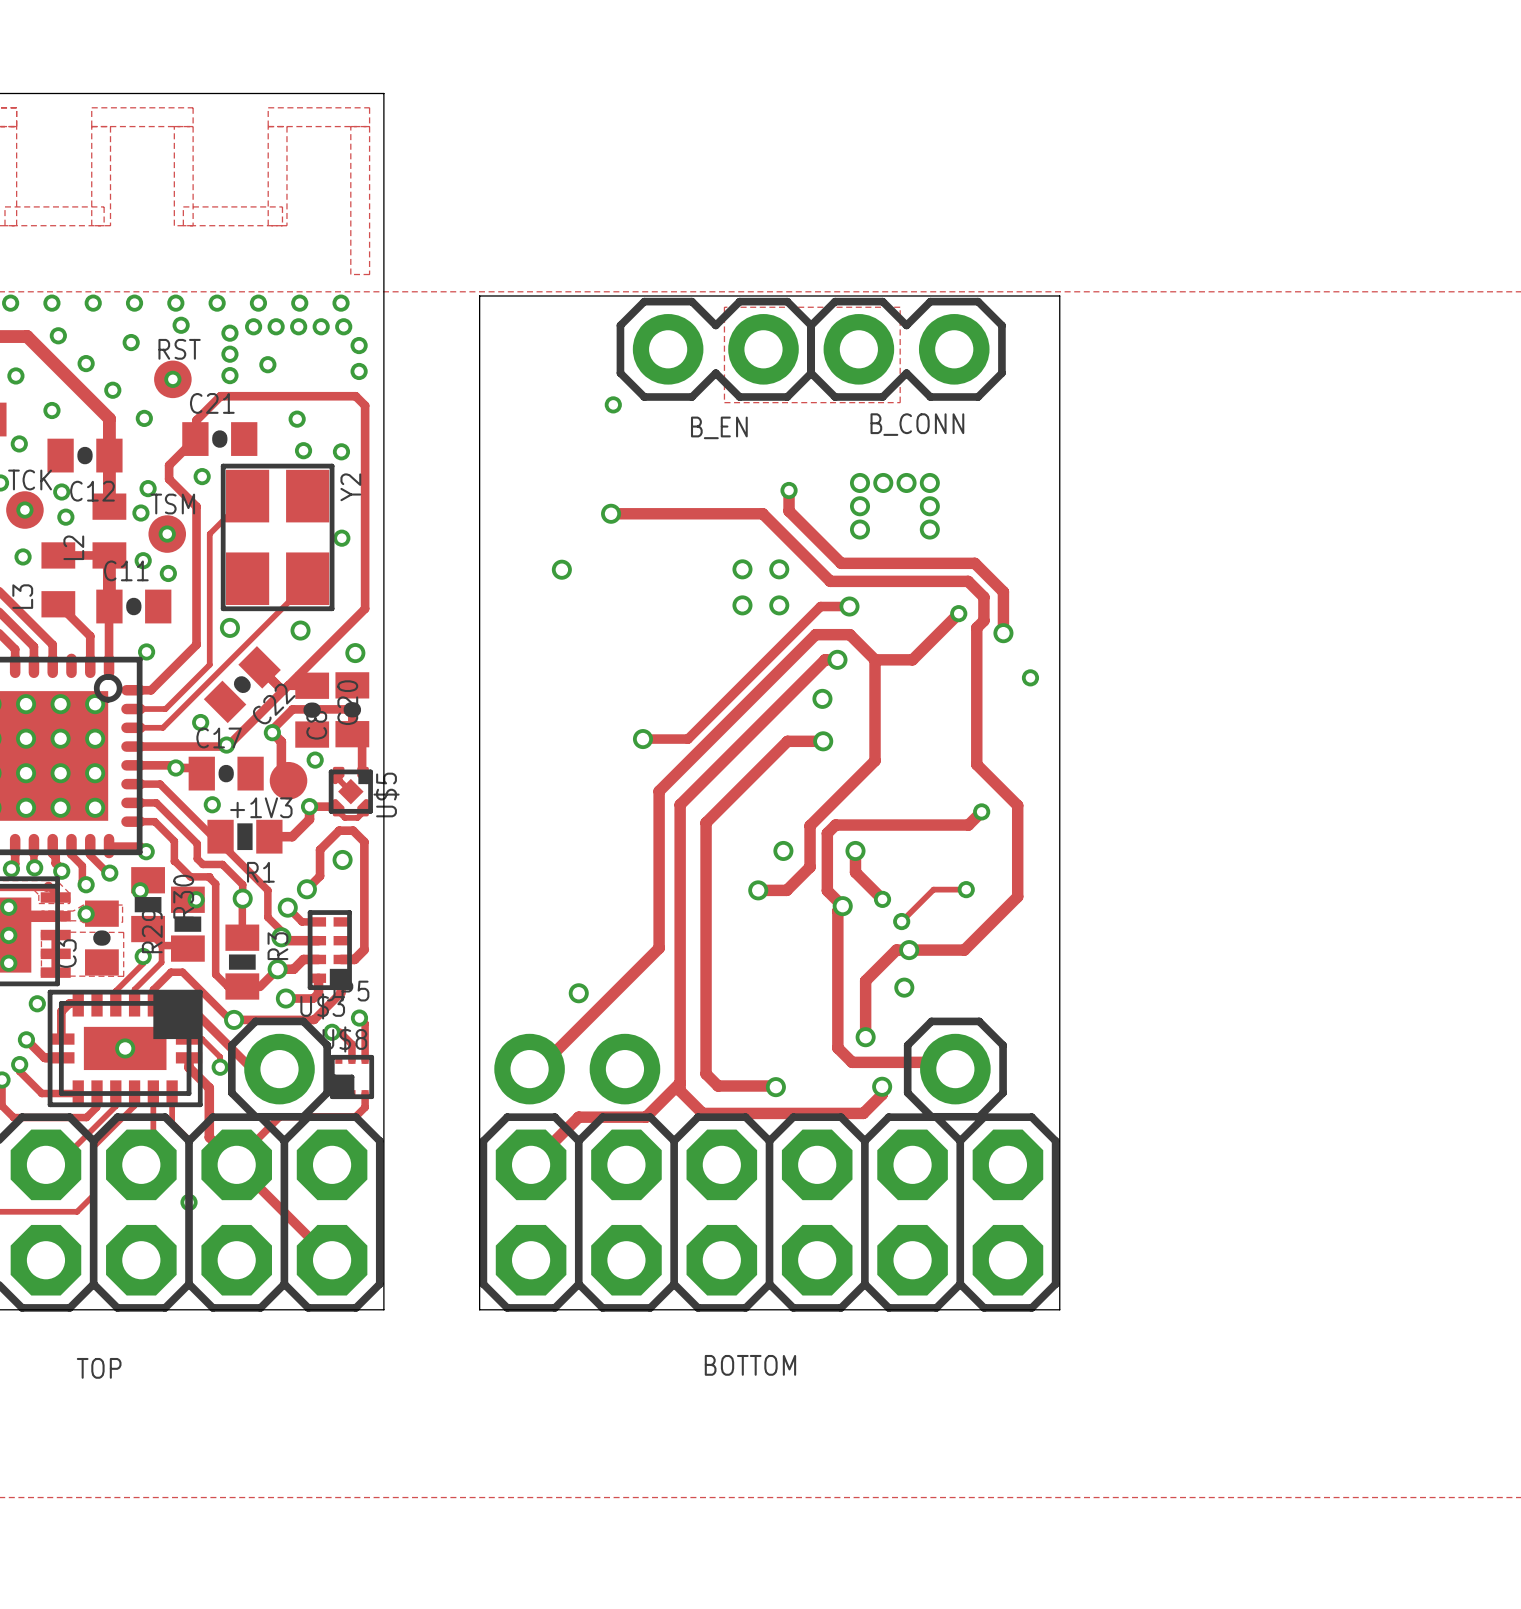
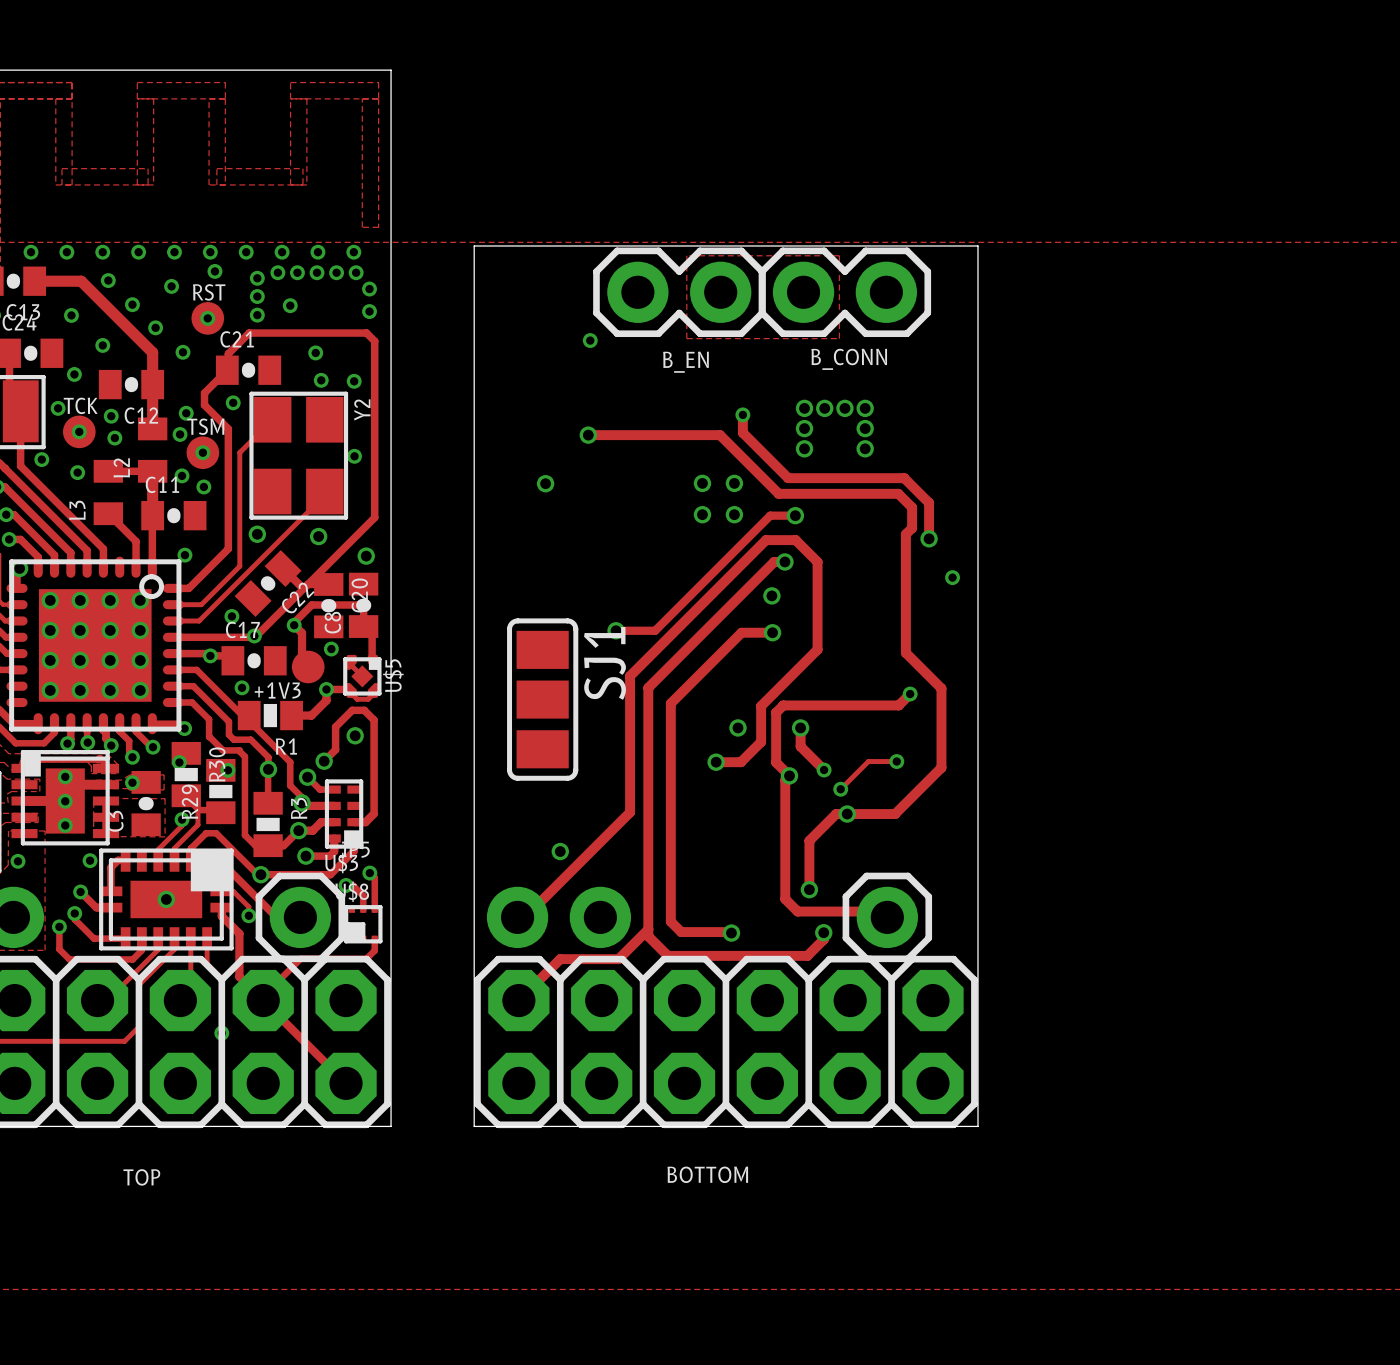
track: (958, 613) (912, 659) (875, 659) -> none
via: (958, 613) -> none
SJ1: none -> (542, 699)
via: (904, 987) -> none

